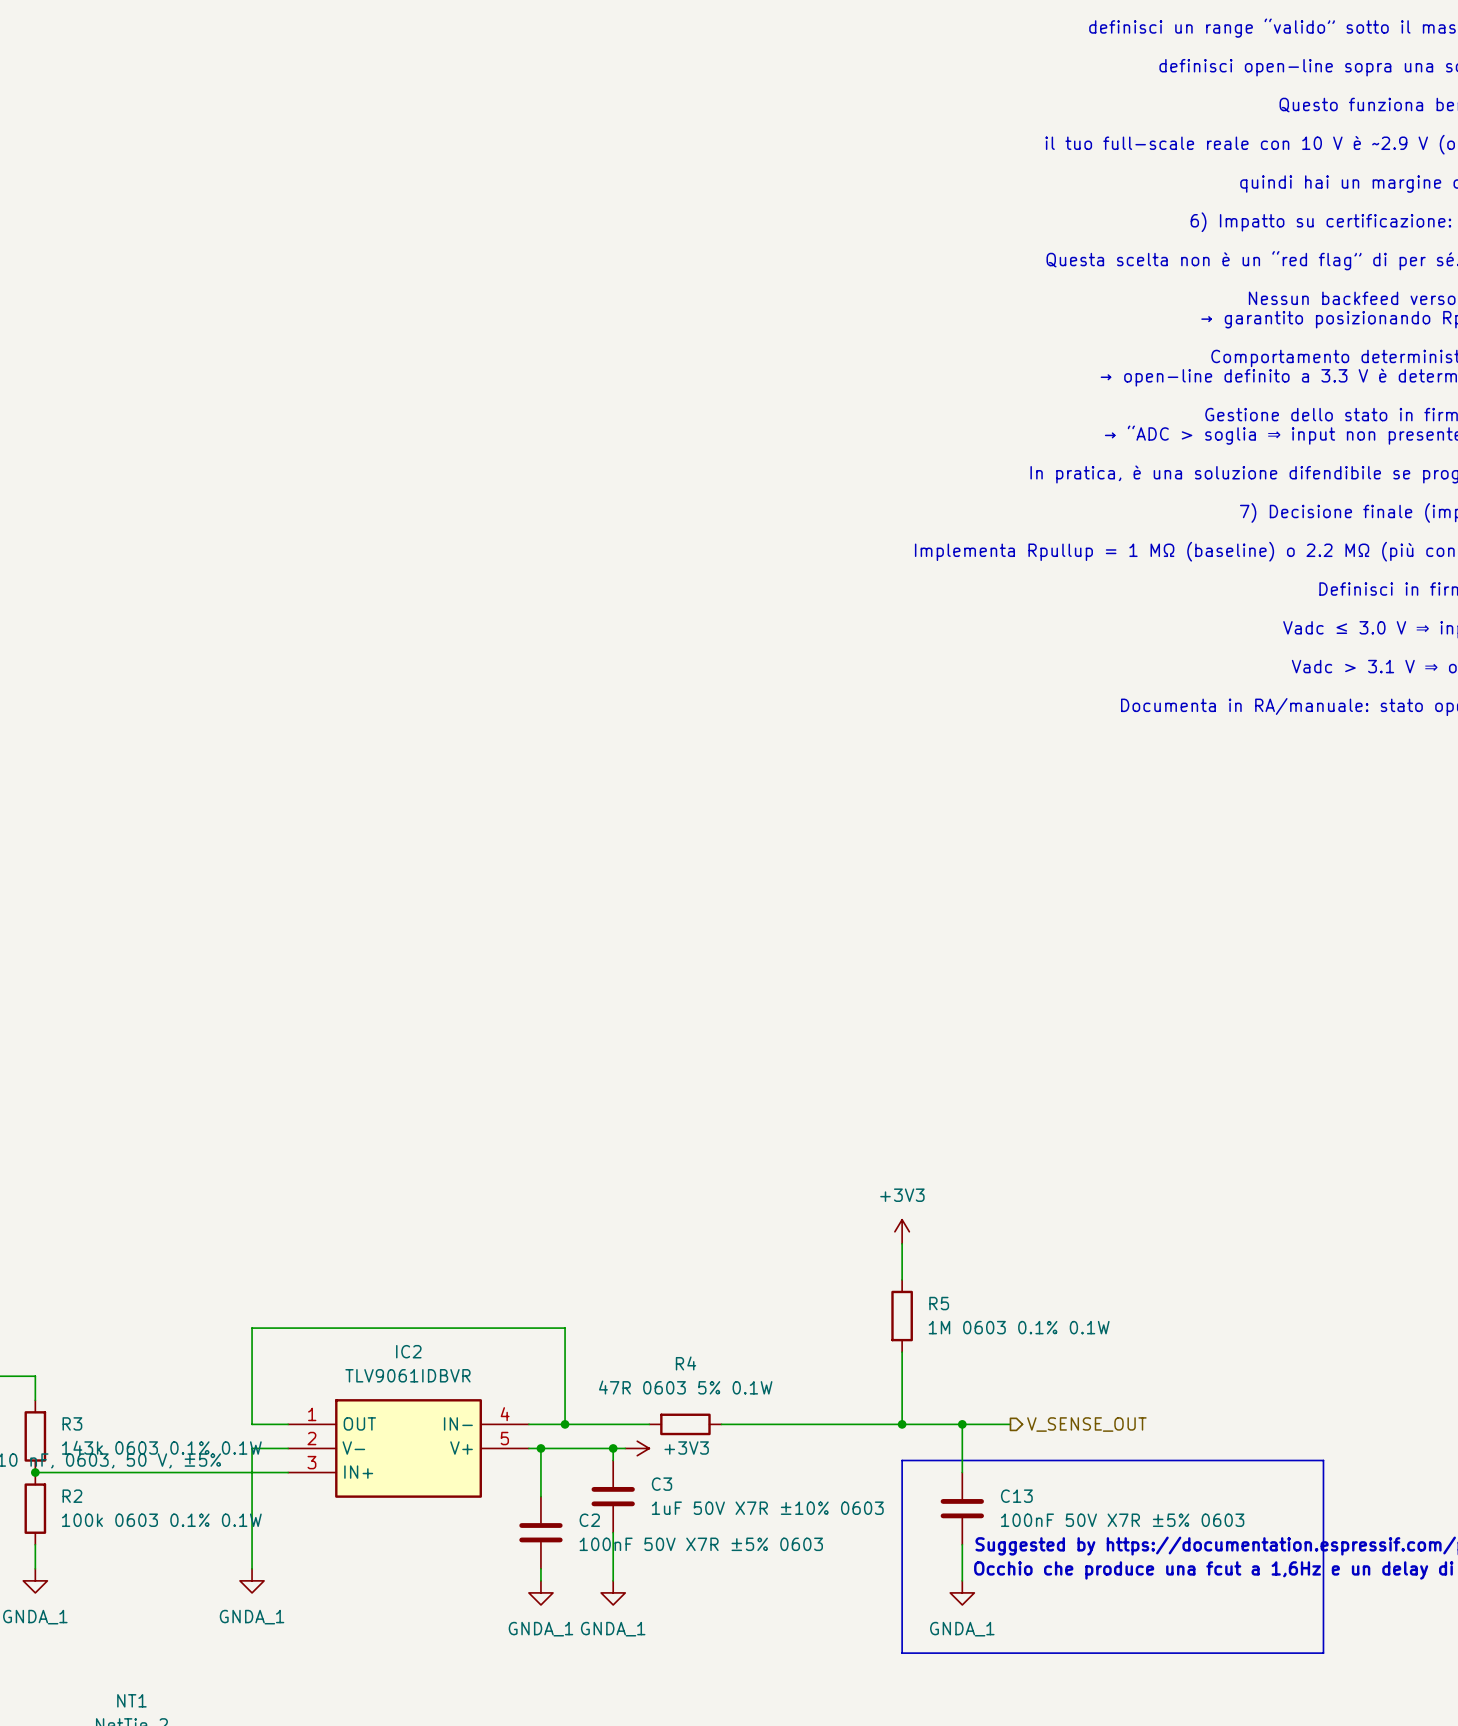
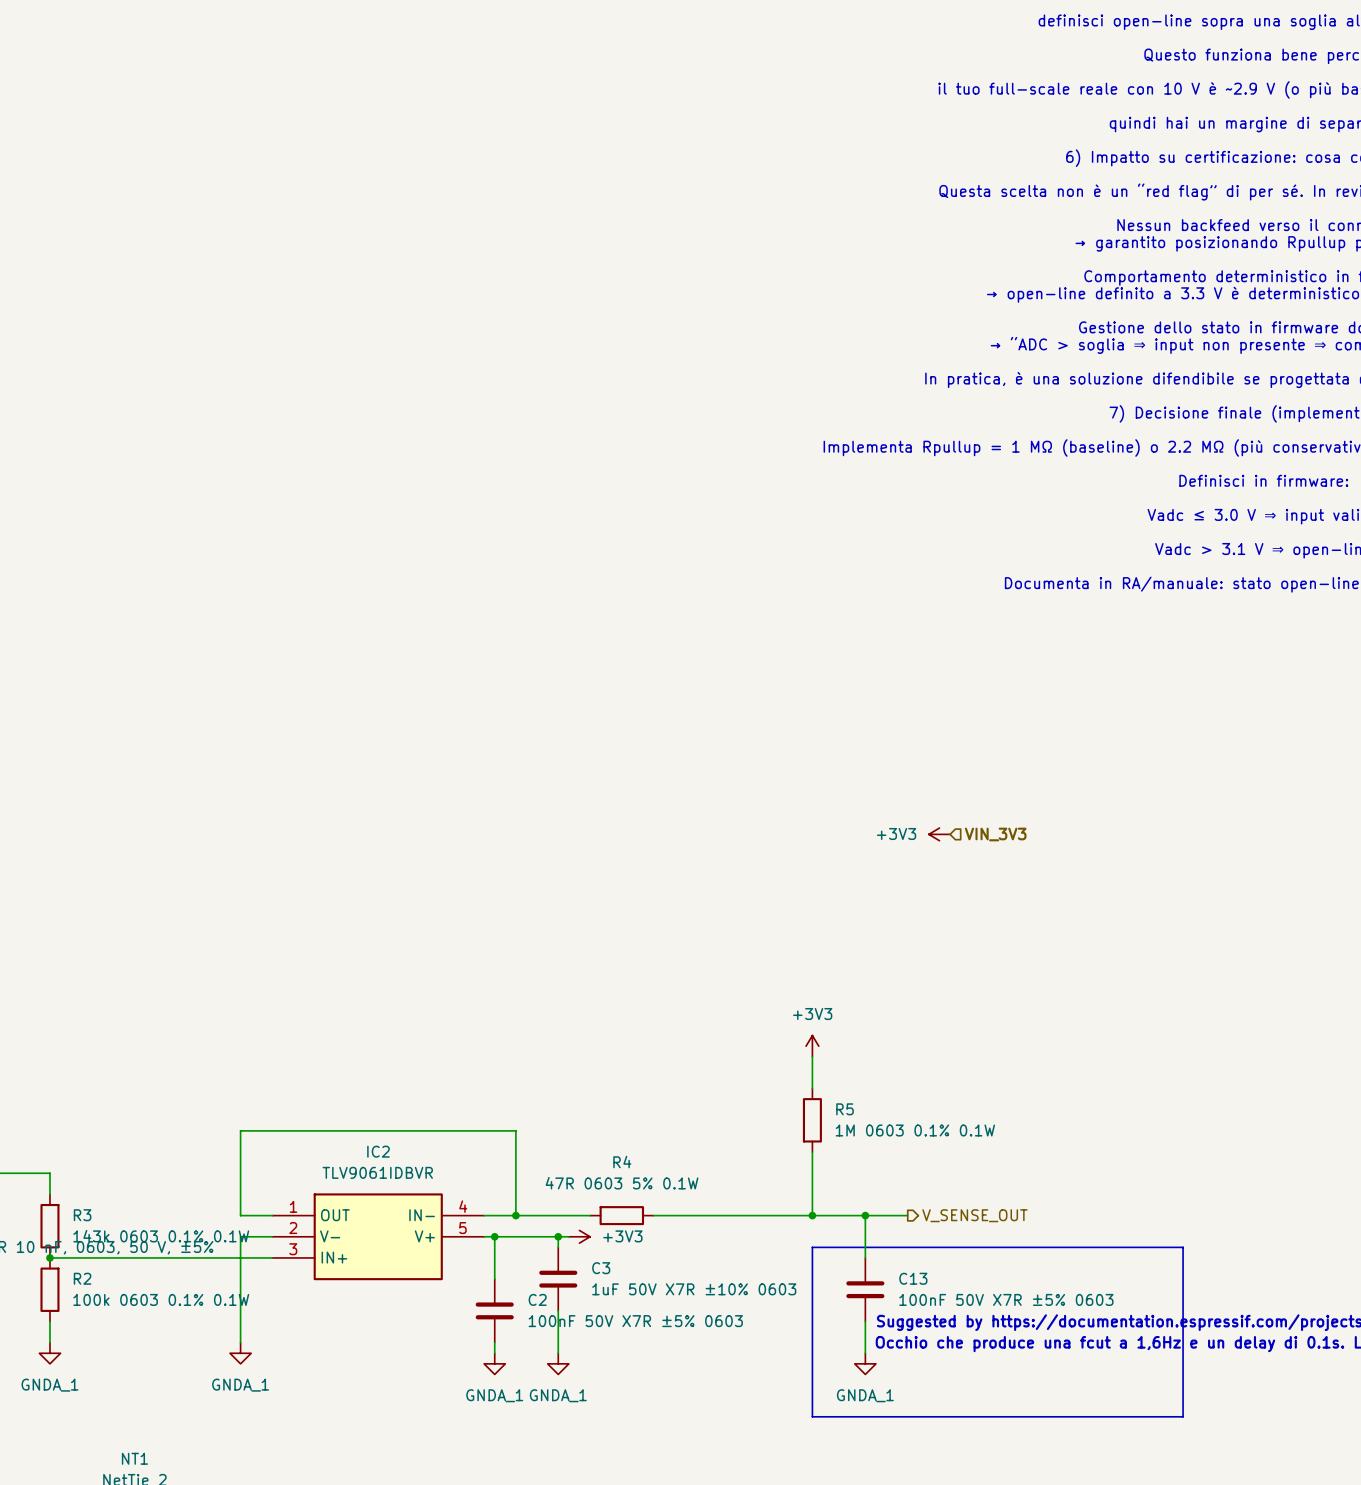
power symbol: none -> +3V3 (939, 834)
hierarchical label: none -> VIN_3V3 (995, 834)

